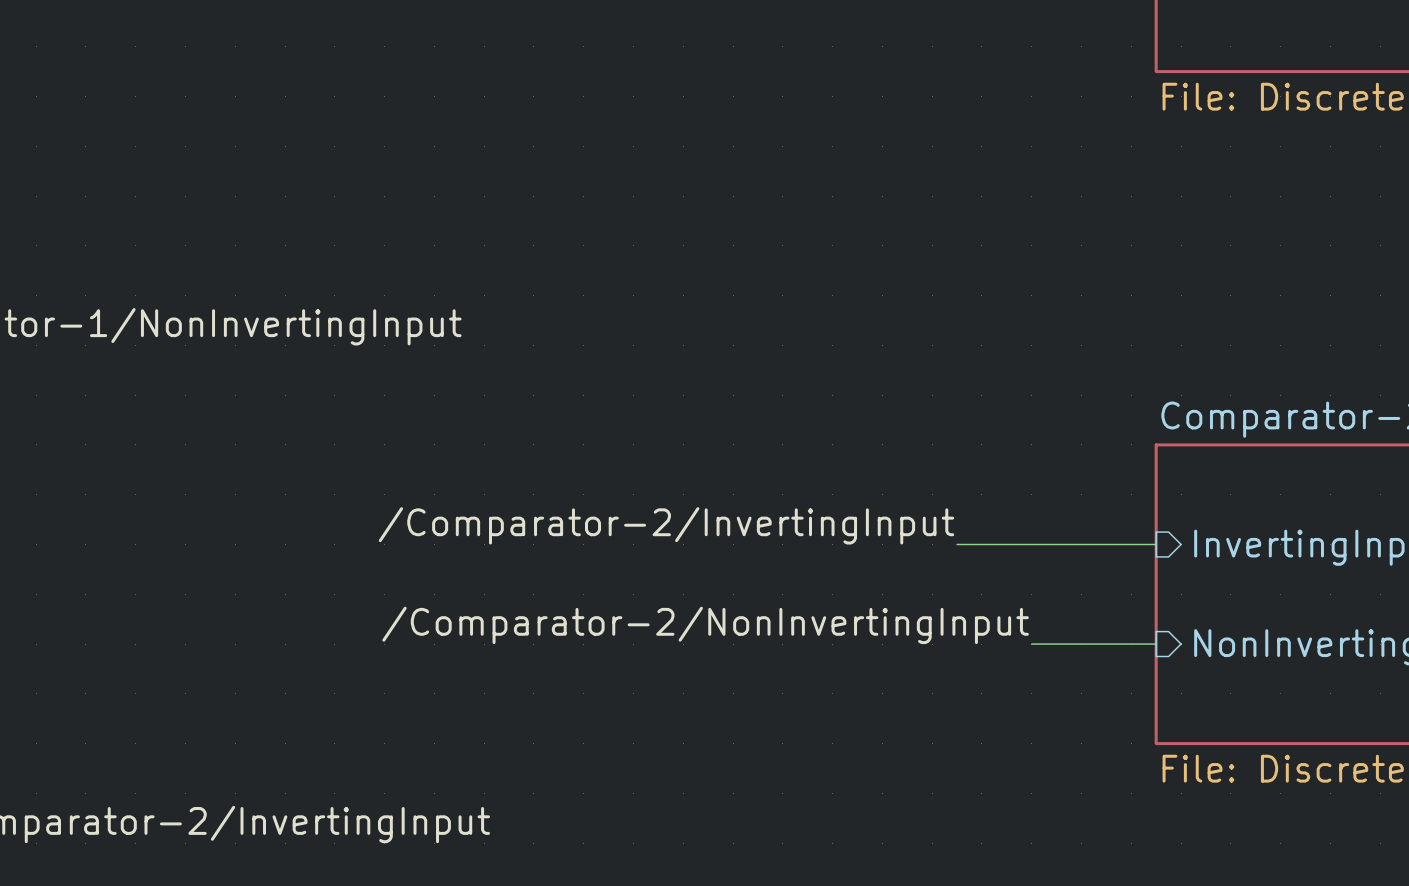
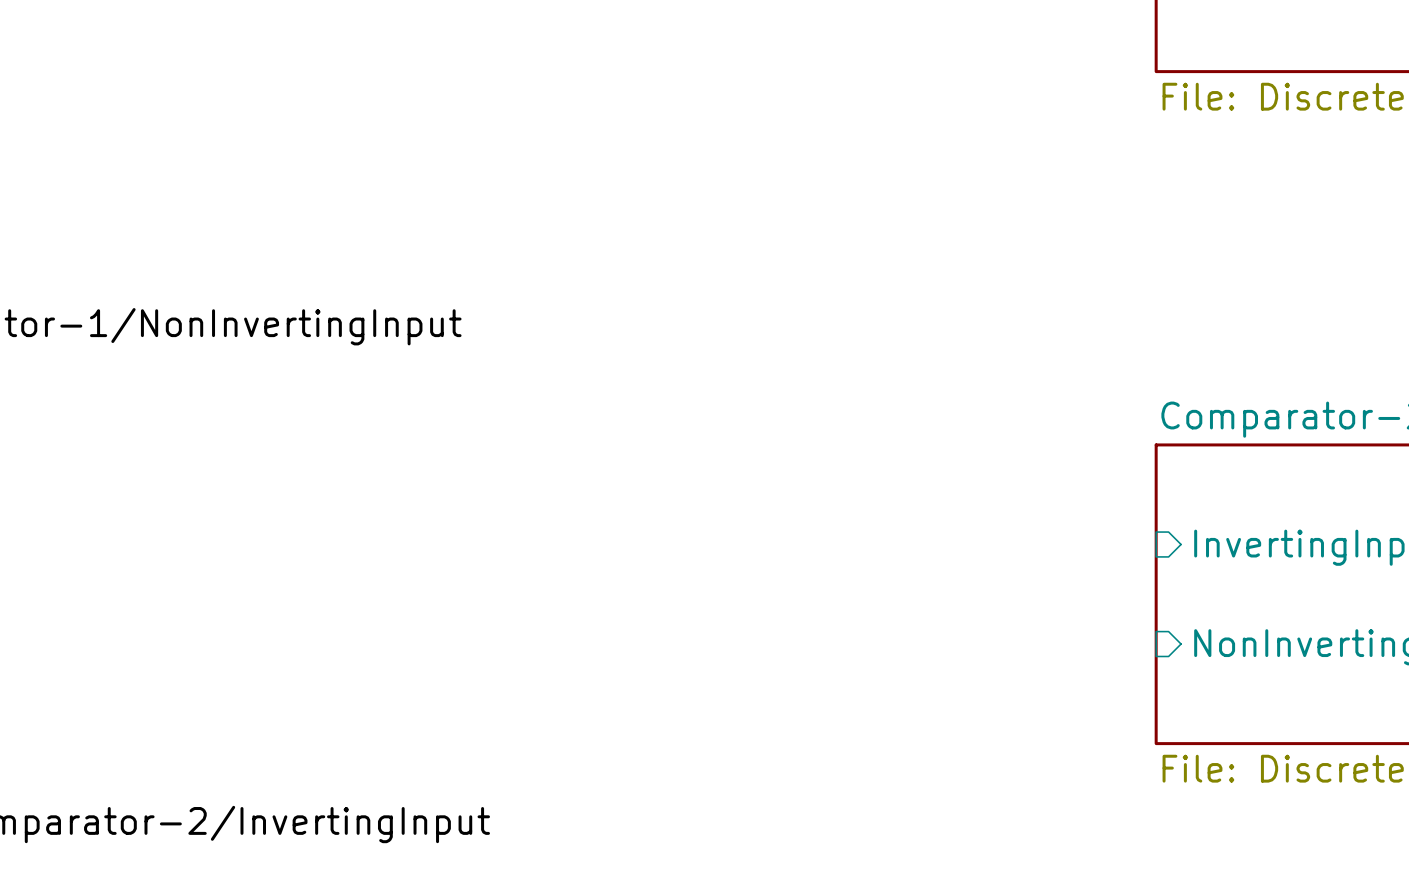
label: /Comparator-2/InvertingInput (666, 525) -> none
wire: (957, 544) (1156, 544) -> none
label: /Comparator-2/NonInvertingInput (705, 625) -> none
wire: (1031, 644) (1156, 644) -> none

